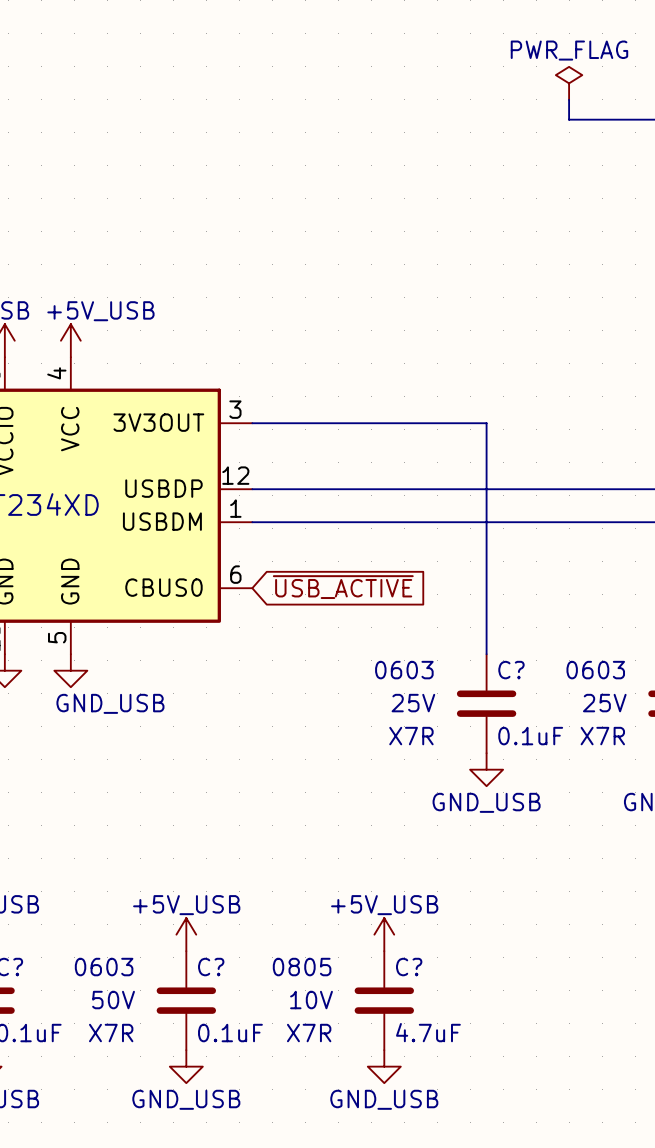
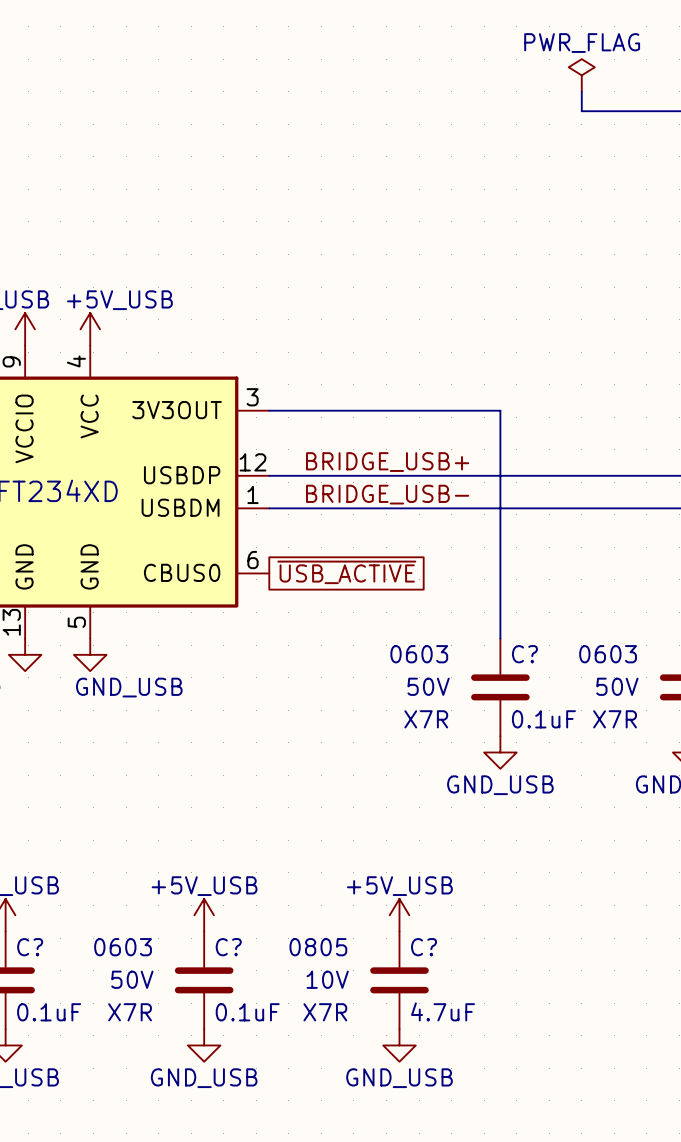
label: none -> BRIDGE_USB+ (387, 462)
label: none -> BRIDGE_USB- (387, 494)
global label shape: input (343, 587) -> passive (346, 572)
C? text: 25V (413, 703) -> 50V (428, 686)
part text: 25V (604, 703) -> 50V (617, 686)

